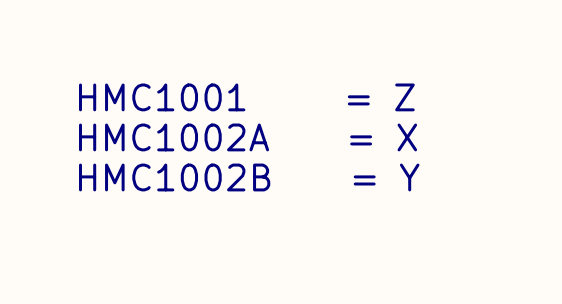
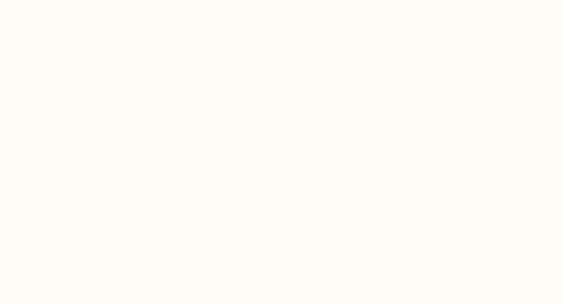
text: HMC1001 = Z (246, 97) -> none
text: HMC1002A = X (248, 137) -> none
text: HMC1002B = Y (249, 177) -> none

